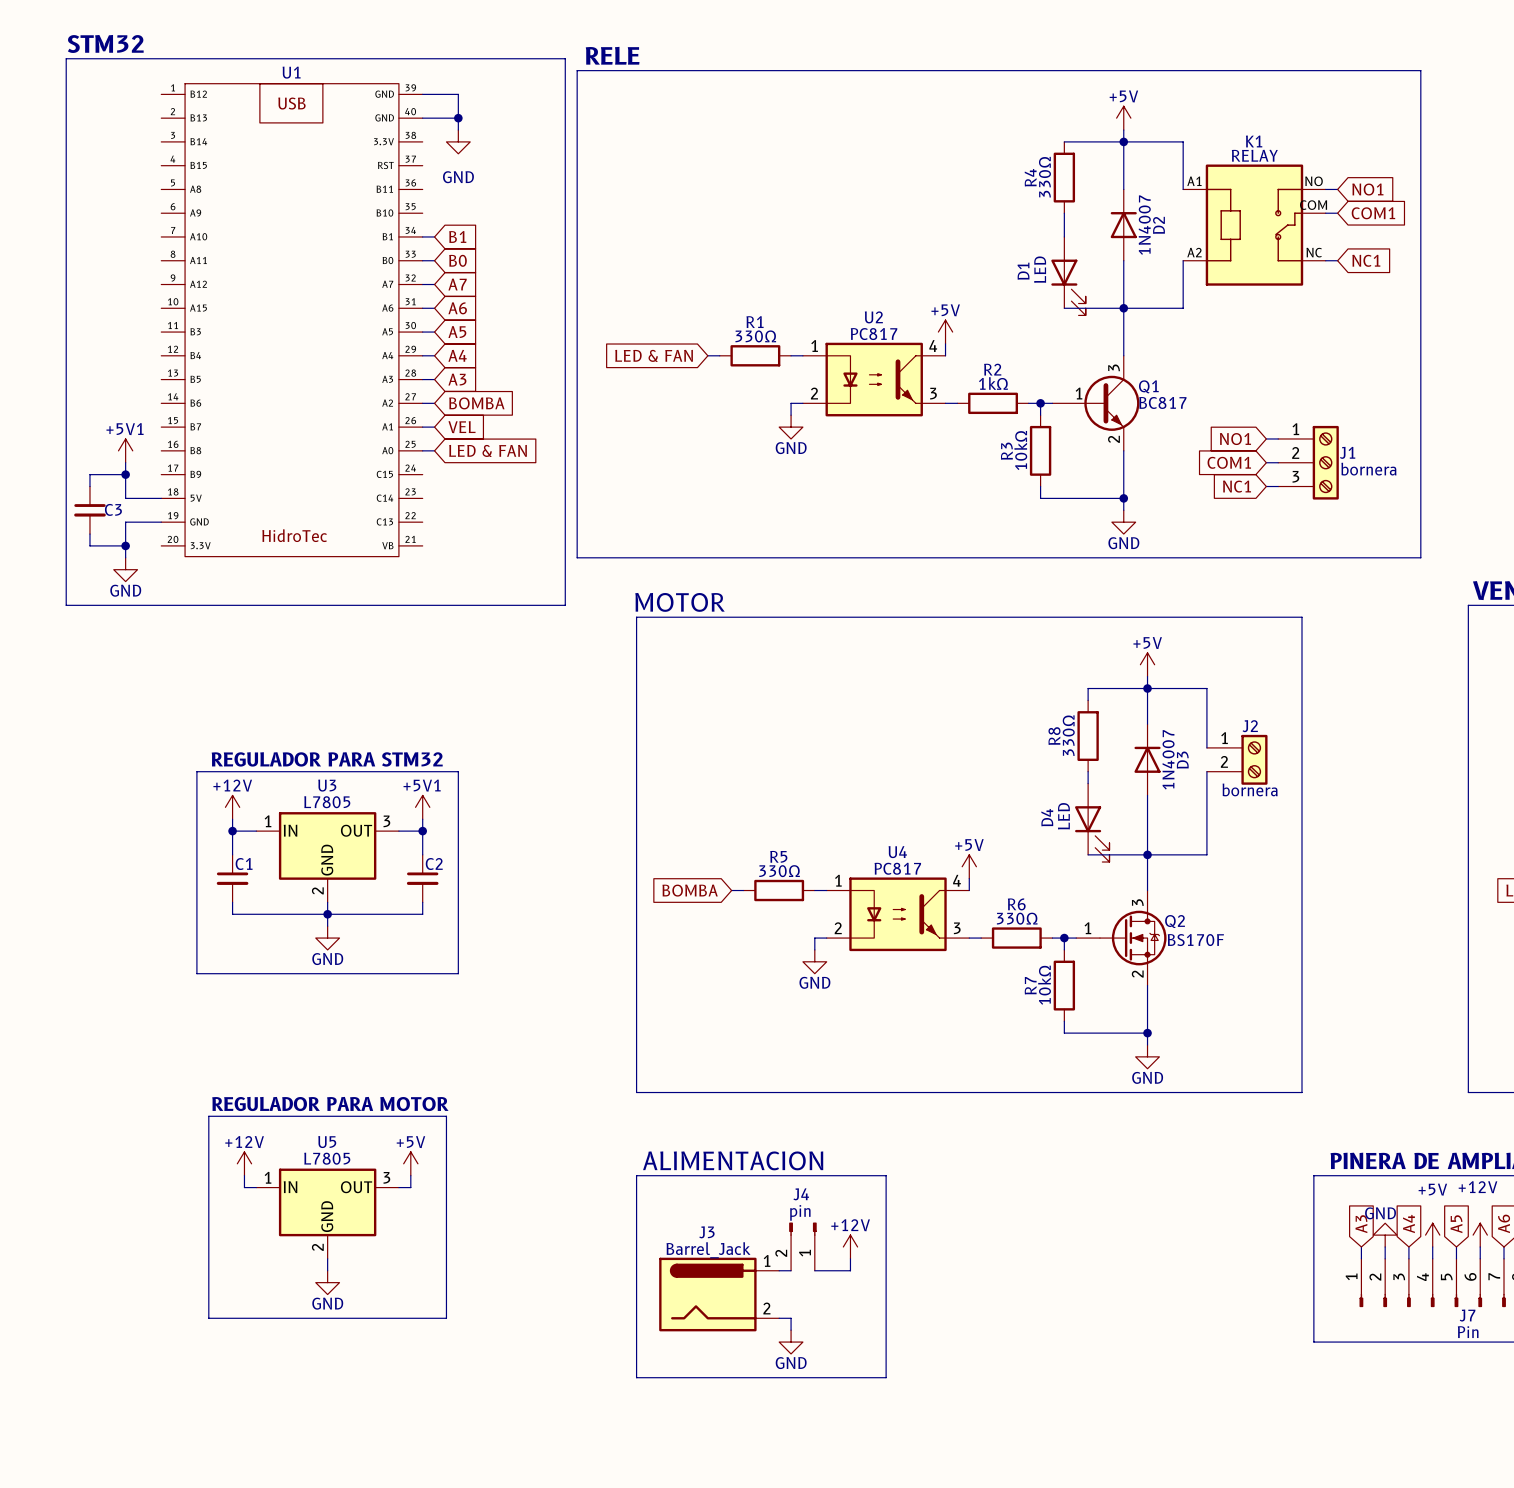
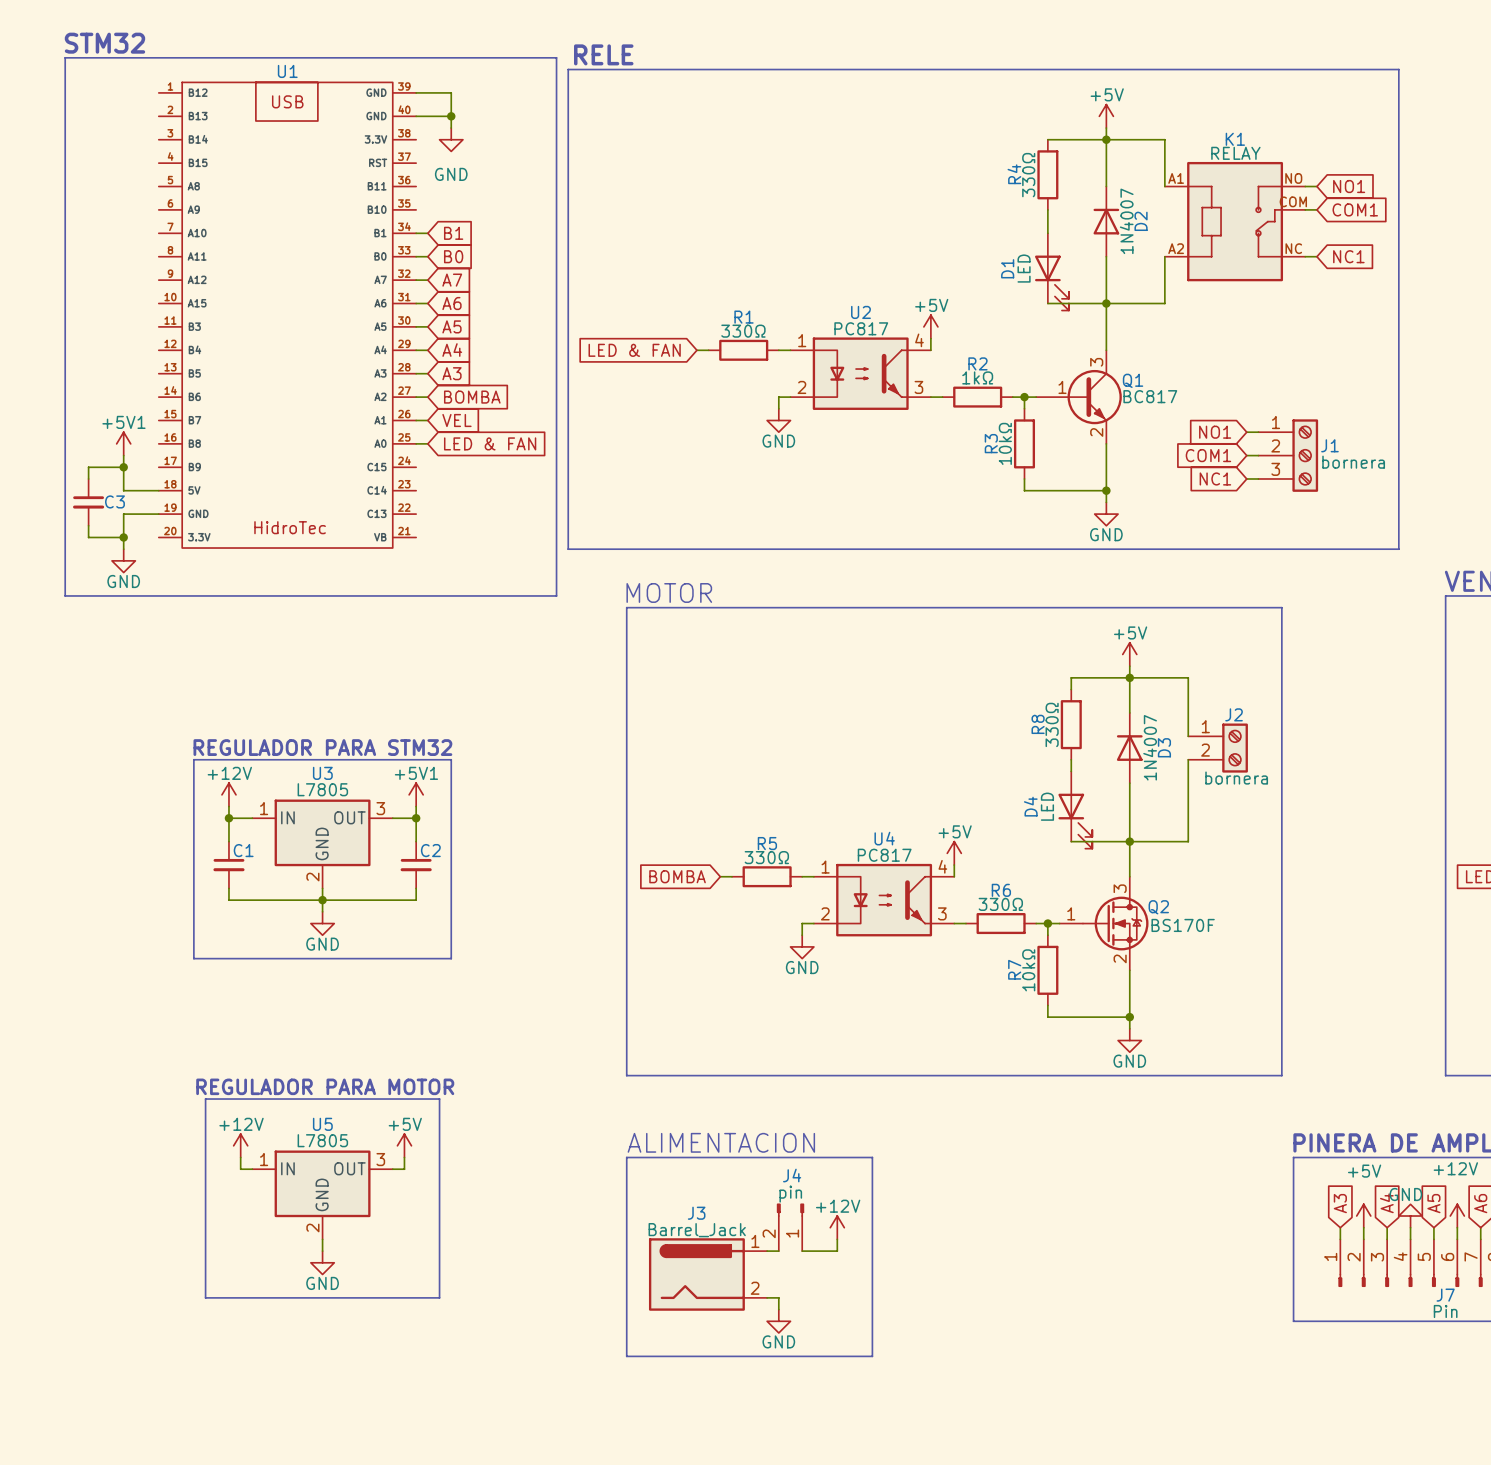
power symbol: GND (1385, 1235) -> +5V (1363, 1216)
power symbol: +5V (1432, 1235) -> GND (1410, 1216)

